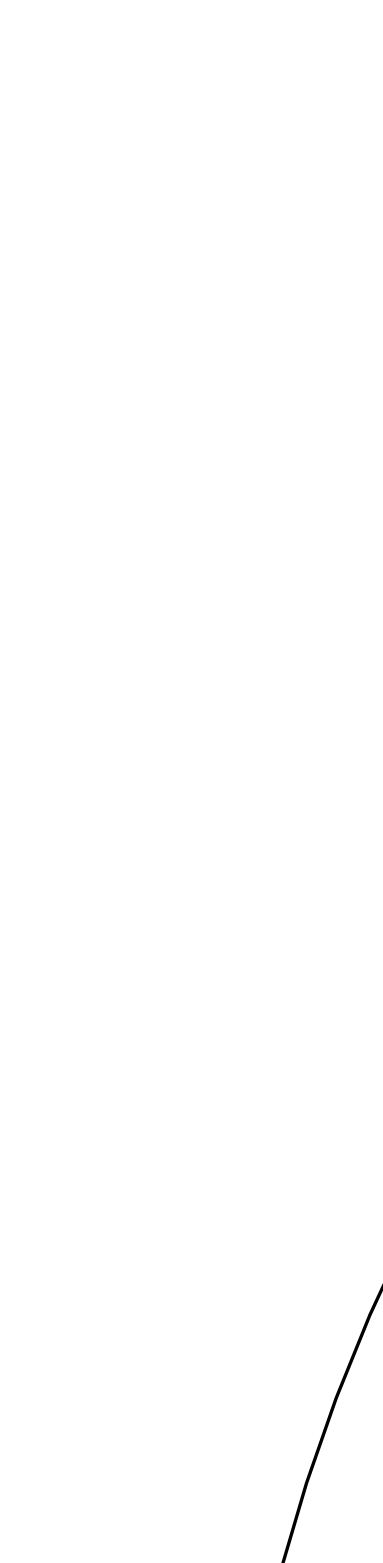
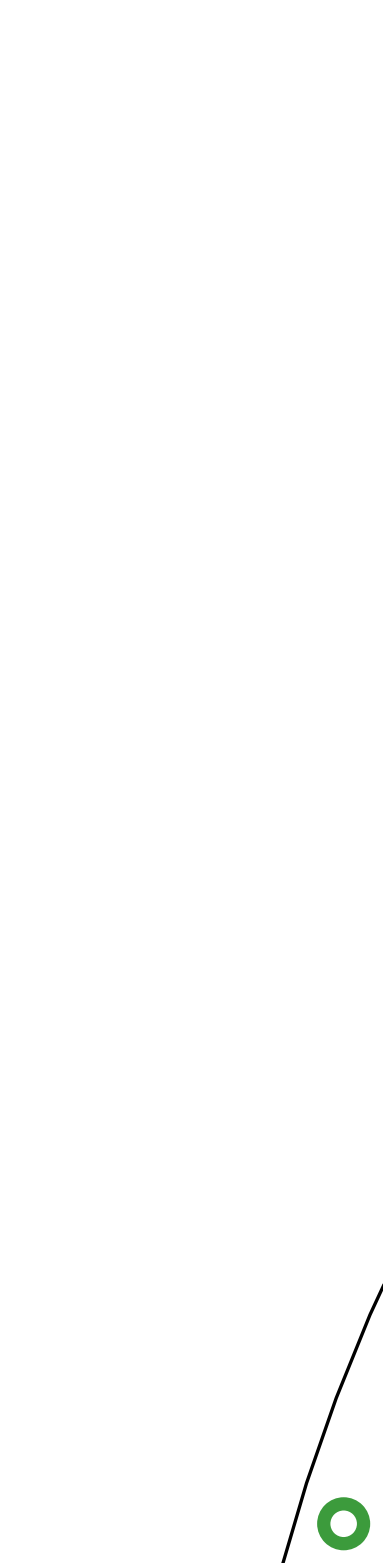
via: none -> (343, 1523)

